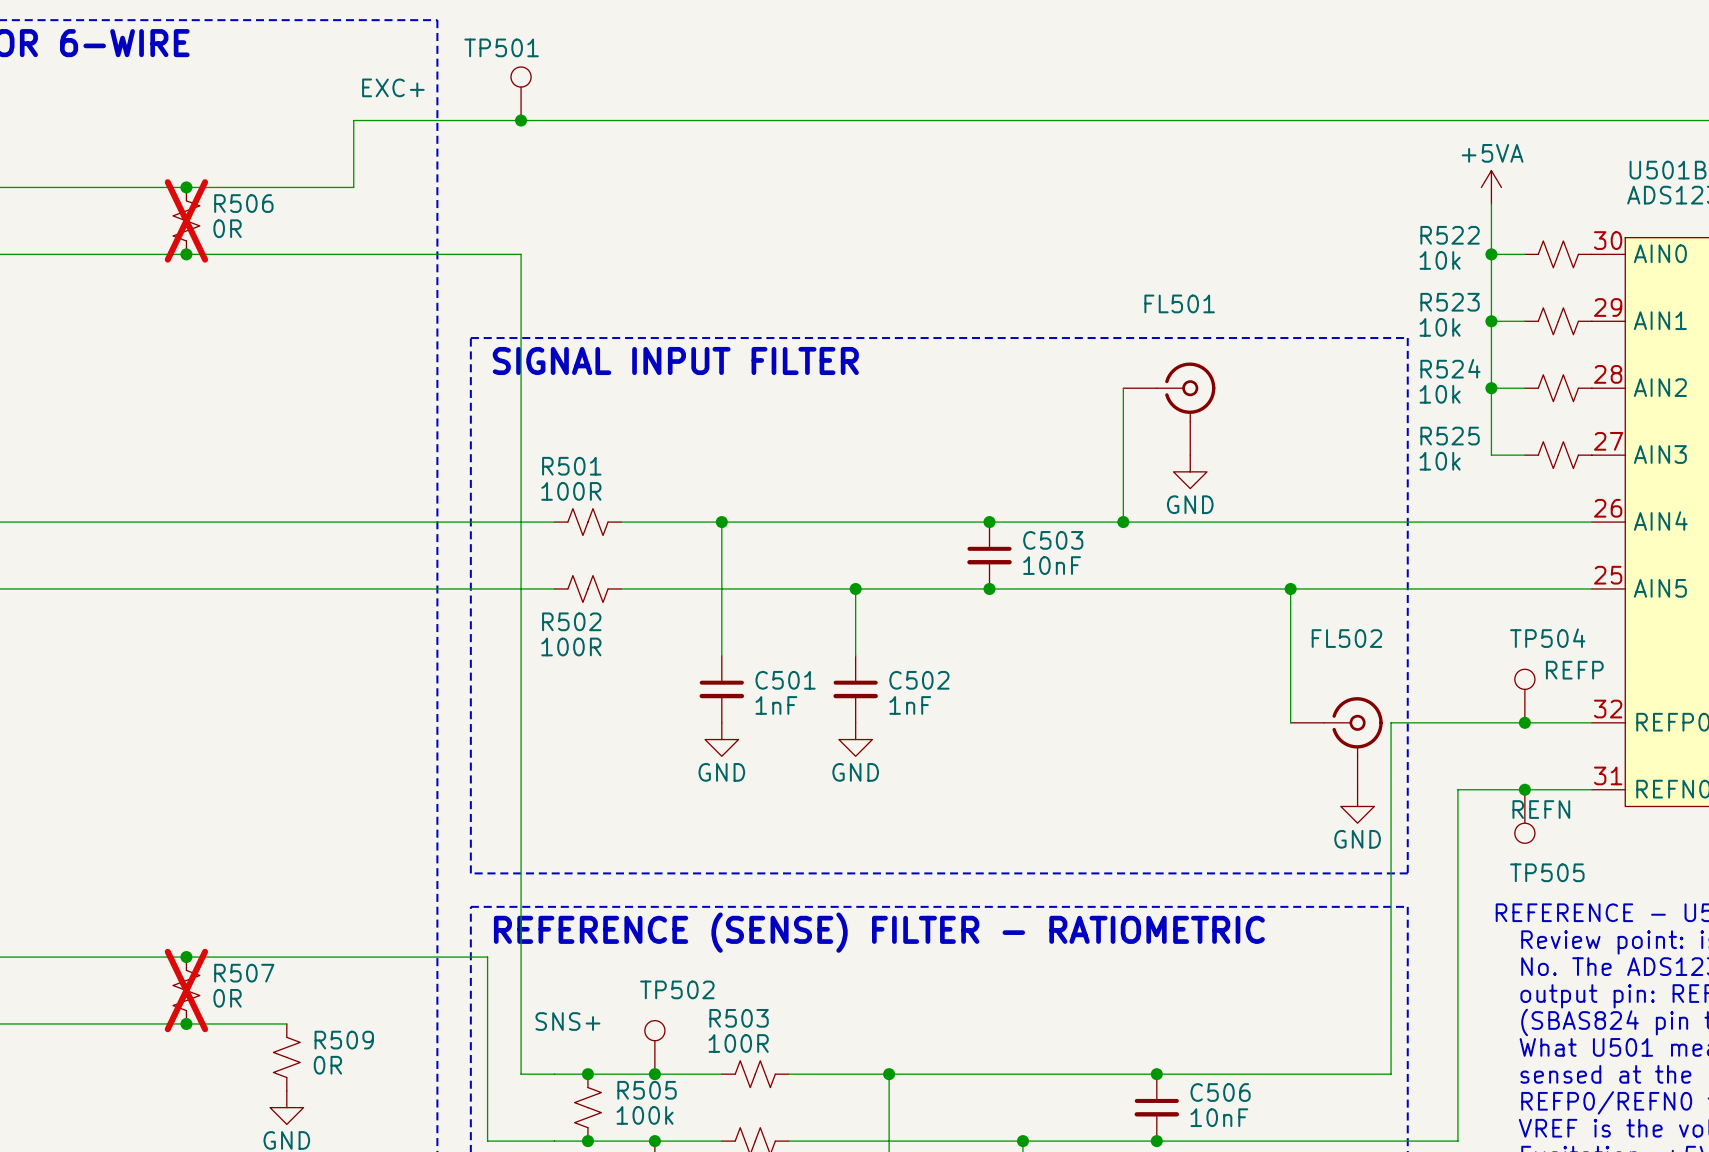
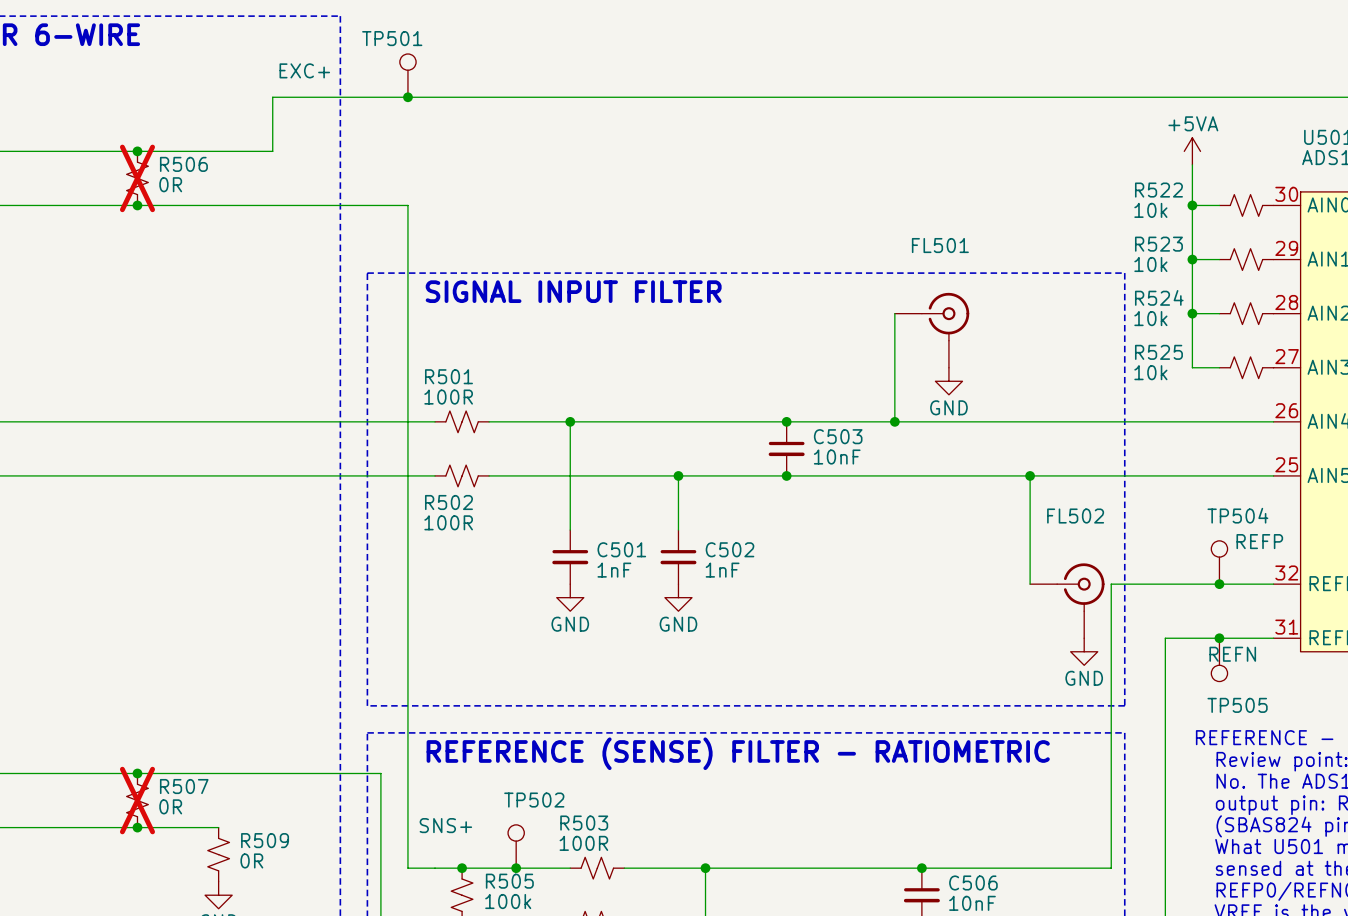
text position: SIGNAL INPUT FILTER (675, 360) -> SIGNAL INPUT FILTER (573, 291)
text position: REFERENCE (SENSE) FILTER - RATIOMETRIC (879, 932) -> REFERENCE (SENSE) FILTER - RATIOMETRIC (738, 753)

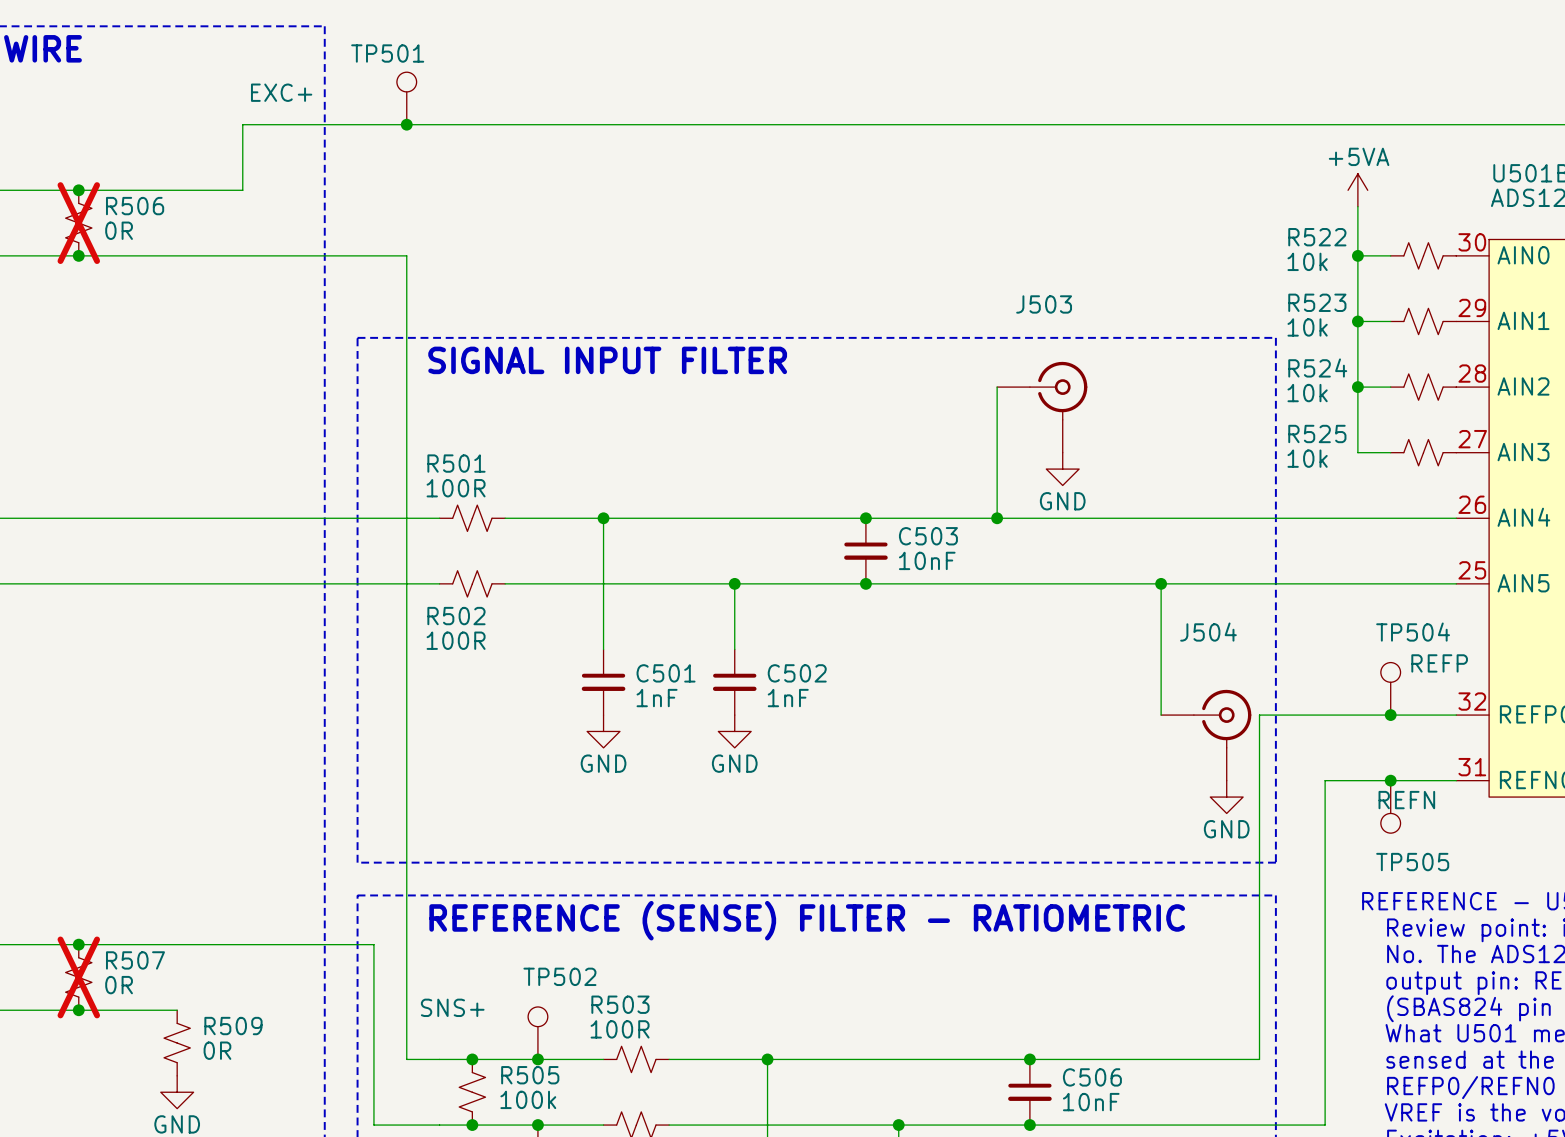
FL501 name: FL501 (940, 245) -> J503 (1044, 304)
FL502 name: FL502 (1075, 516) -> J504 (1208, 632)

